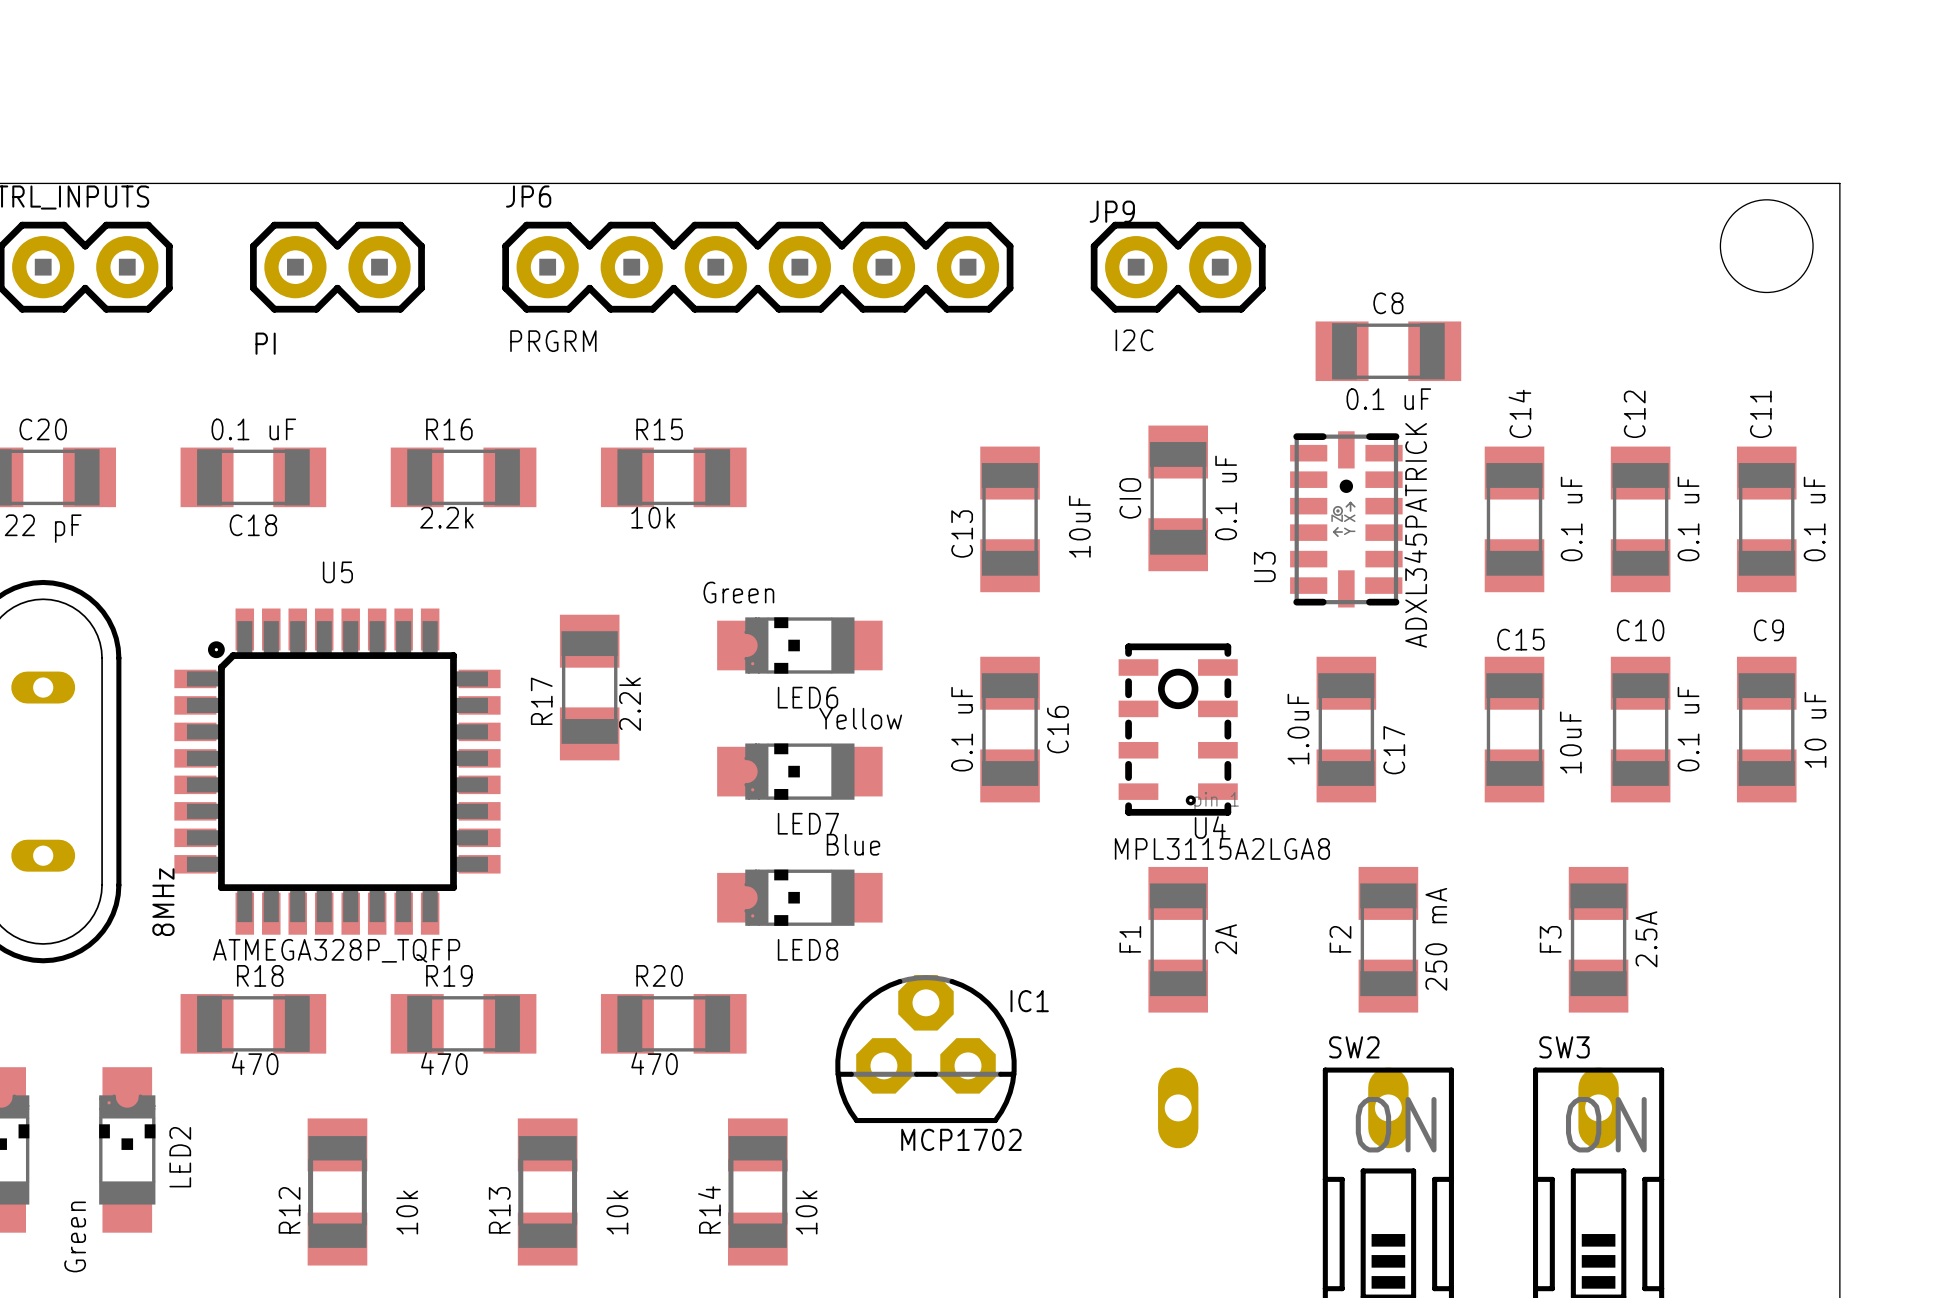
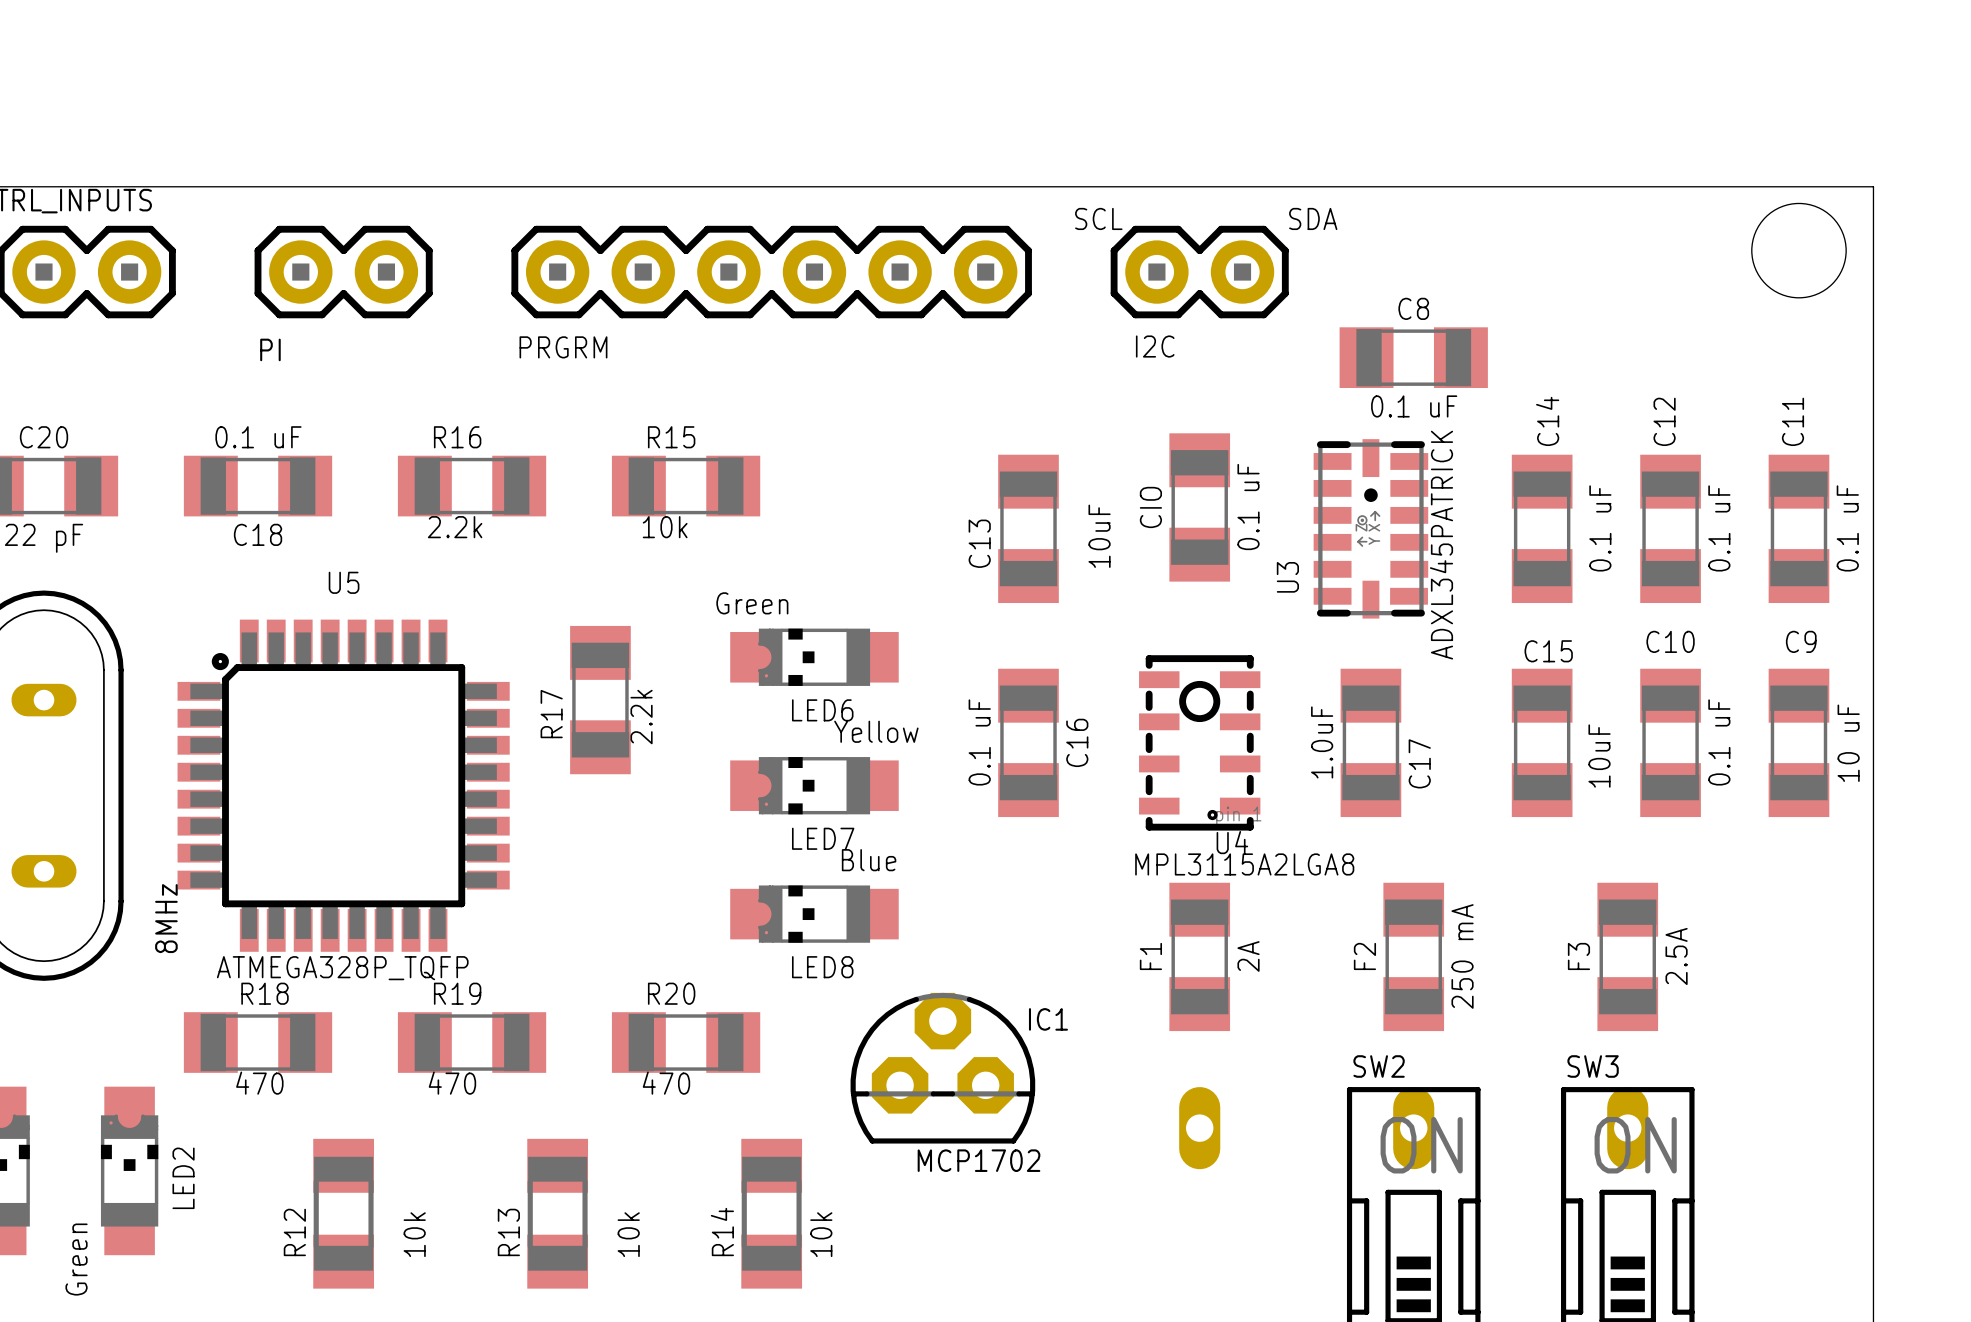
JP6 name: JP6 (528, 196) -> none
JP9 name: JP9 (1112, 211) -> none
text: none -> SCL (1098, 218)
text: none -> SDA (1313, 218)

